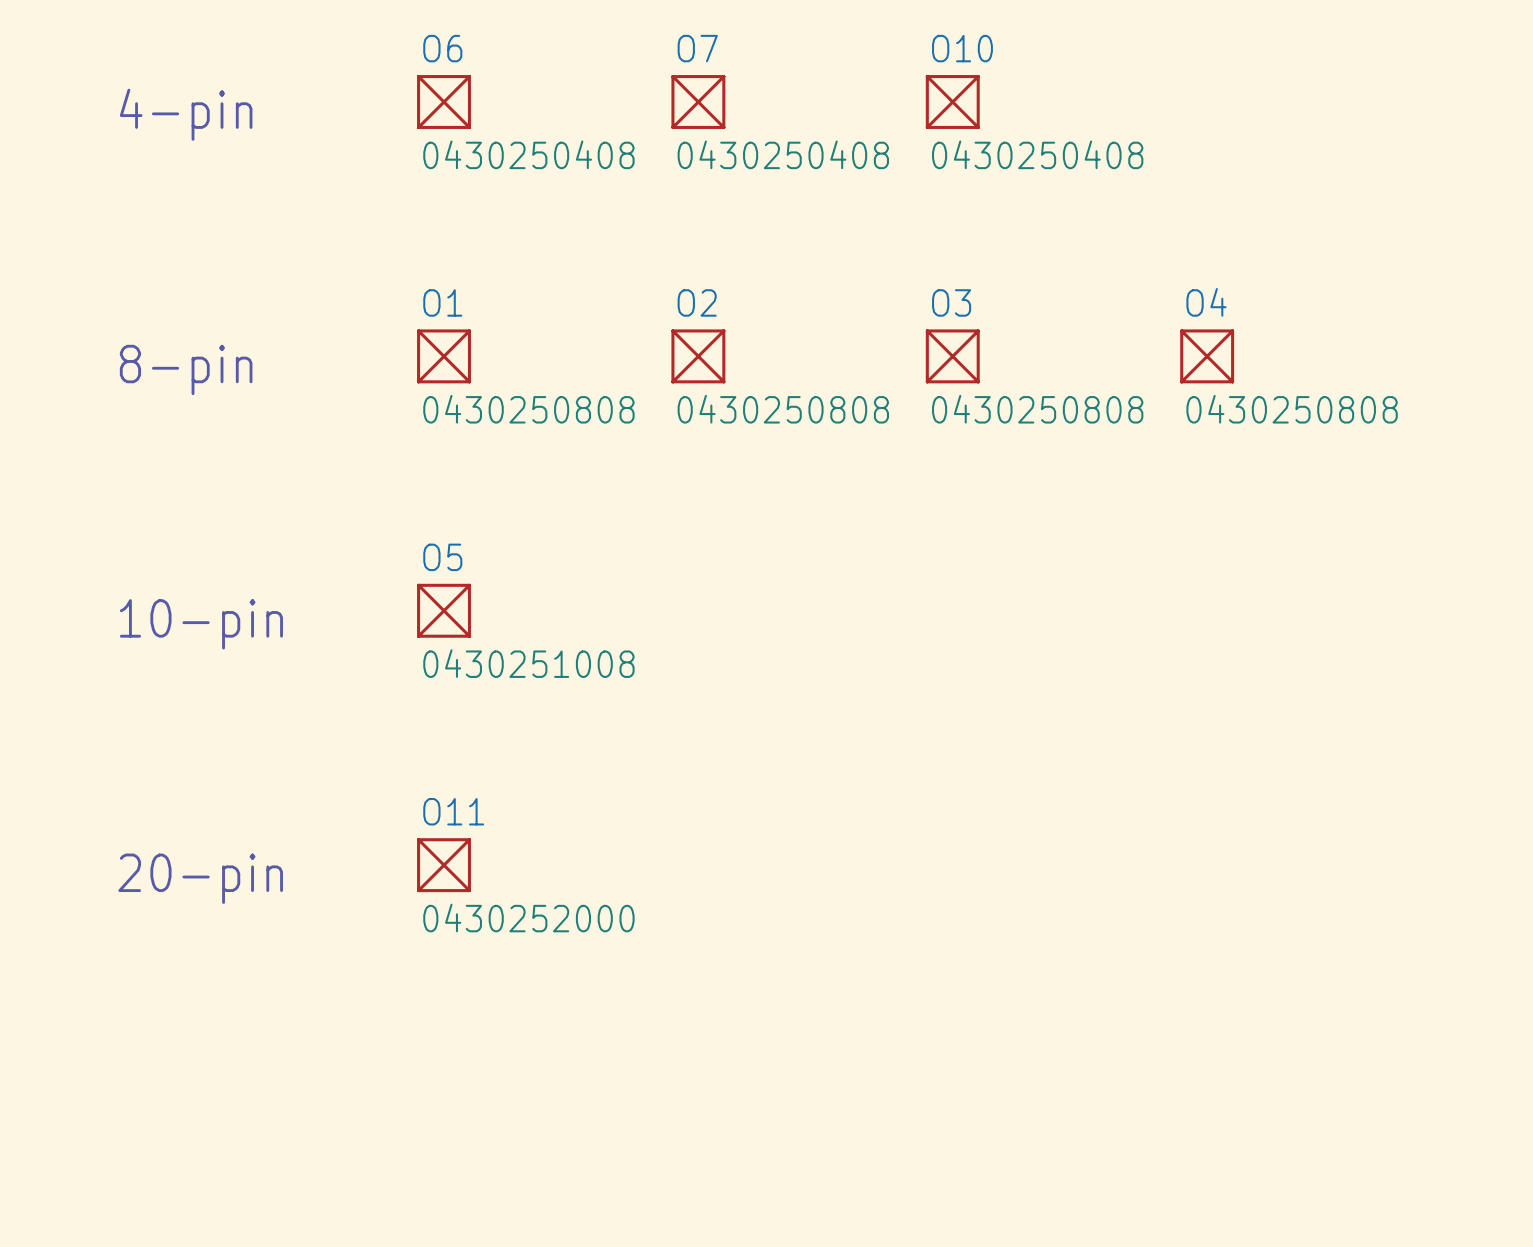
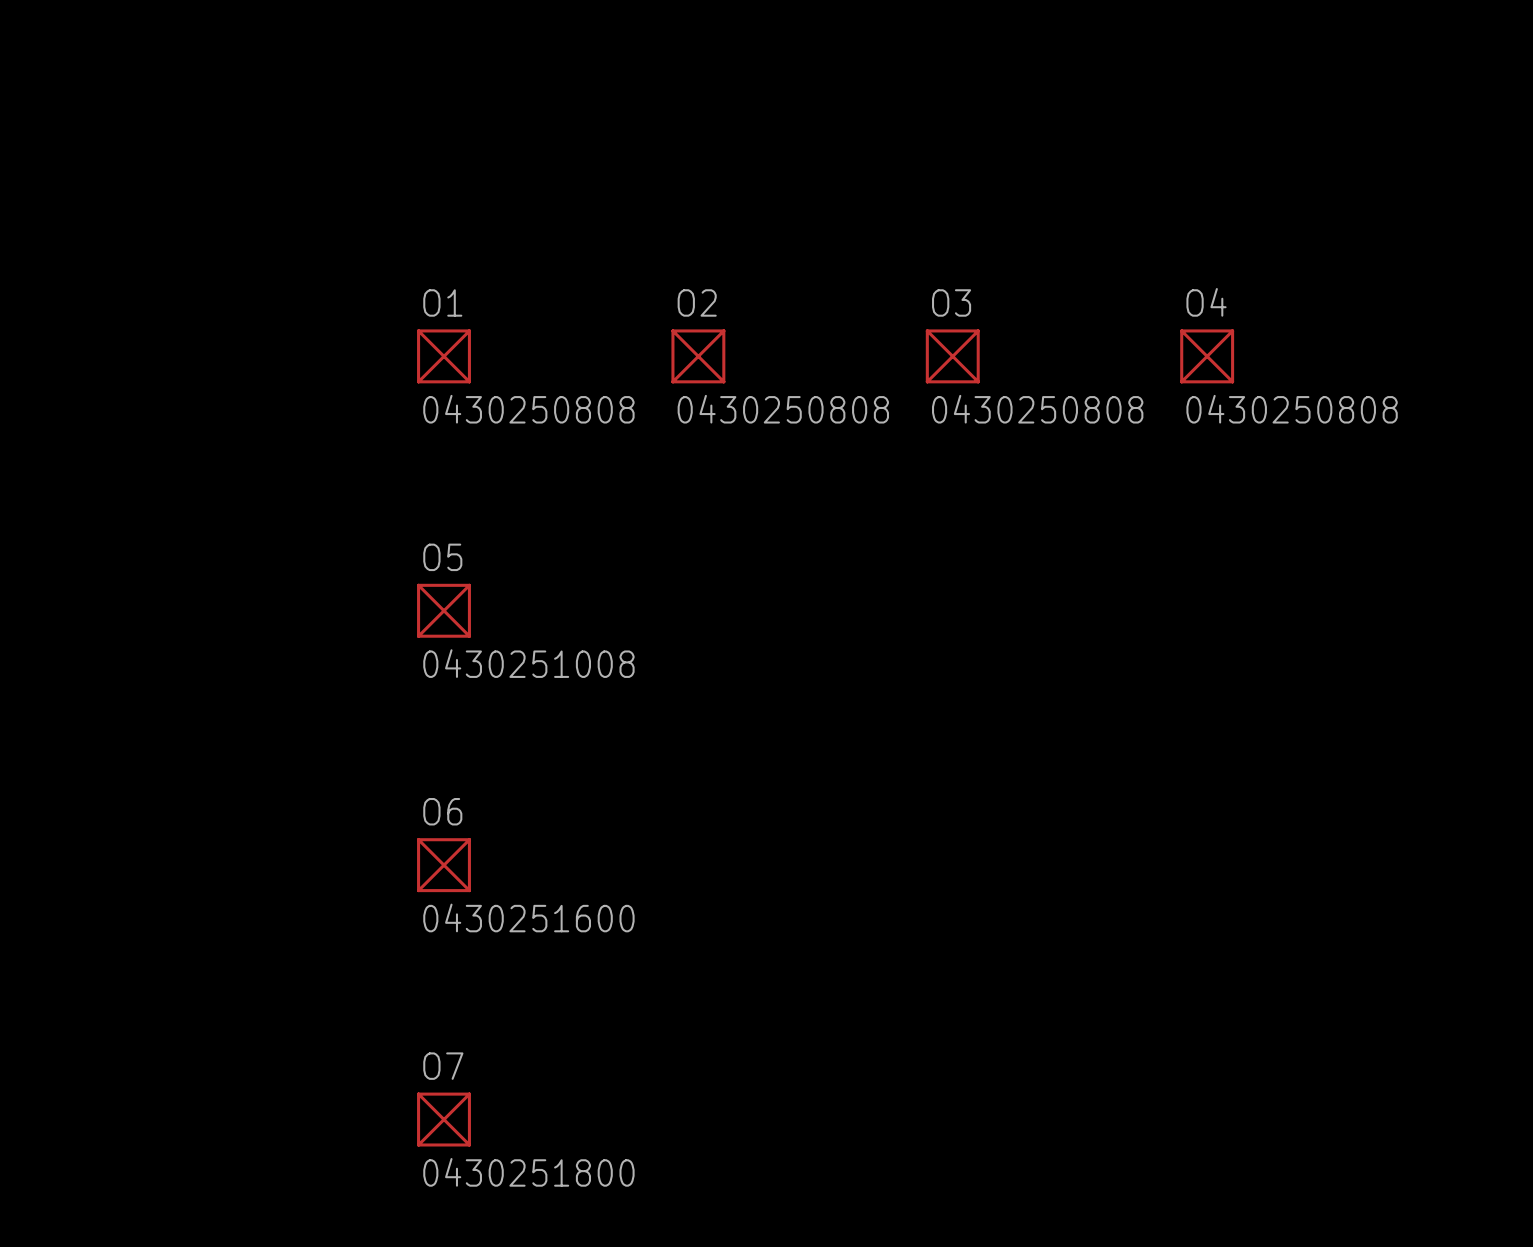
O6: (444, 102) -> none
O7 position: (698, 102) -> (444, 1119)
O10: (952, 102) -> none
text: 4-pin (186, 114) -> none
O7 text: 0430250408 (783, 154) -> 0430251800 (528, 1172)
text: 8-pin (186, 369) -> none
text: 10-pin (201, 624) -> none
O11 name: O11 (453, 811) -> O6 (442, 811)
text: 20-pin (200, 878) -> none
O11 text: 0430252000 (528, 917) -> 0430251600 (528, 917)

